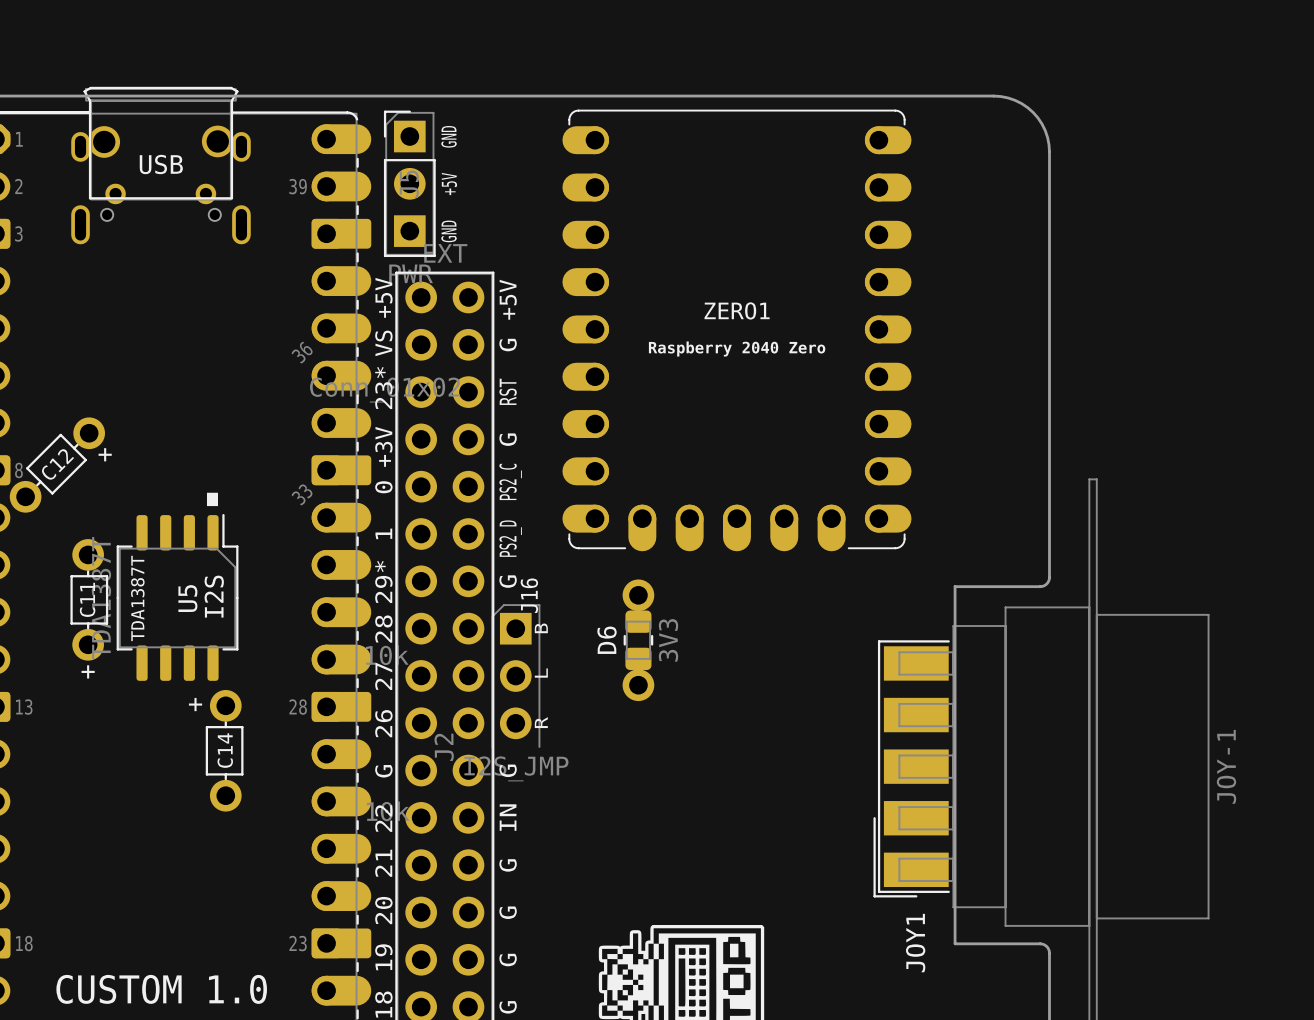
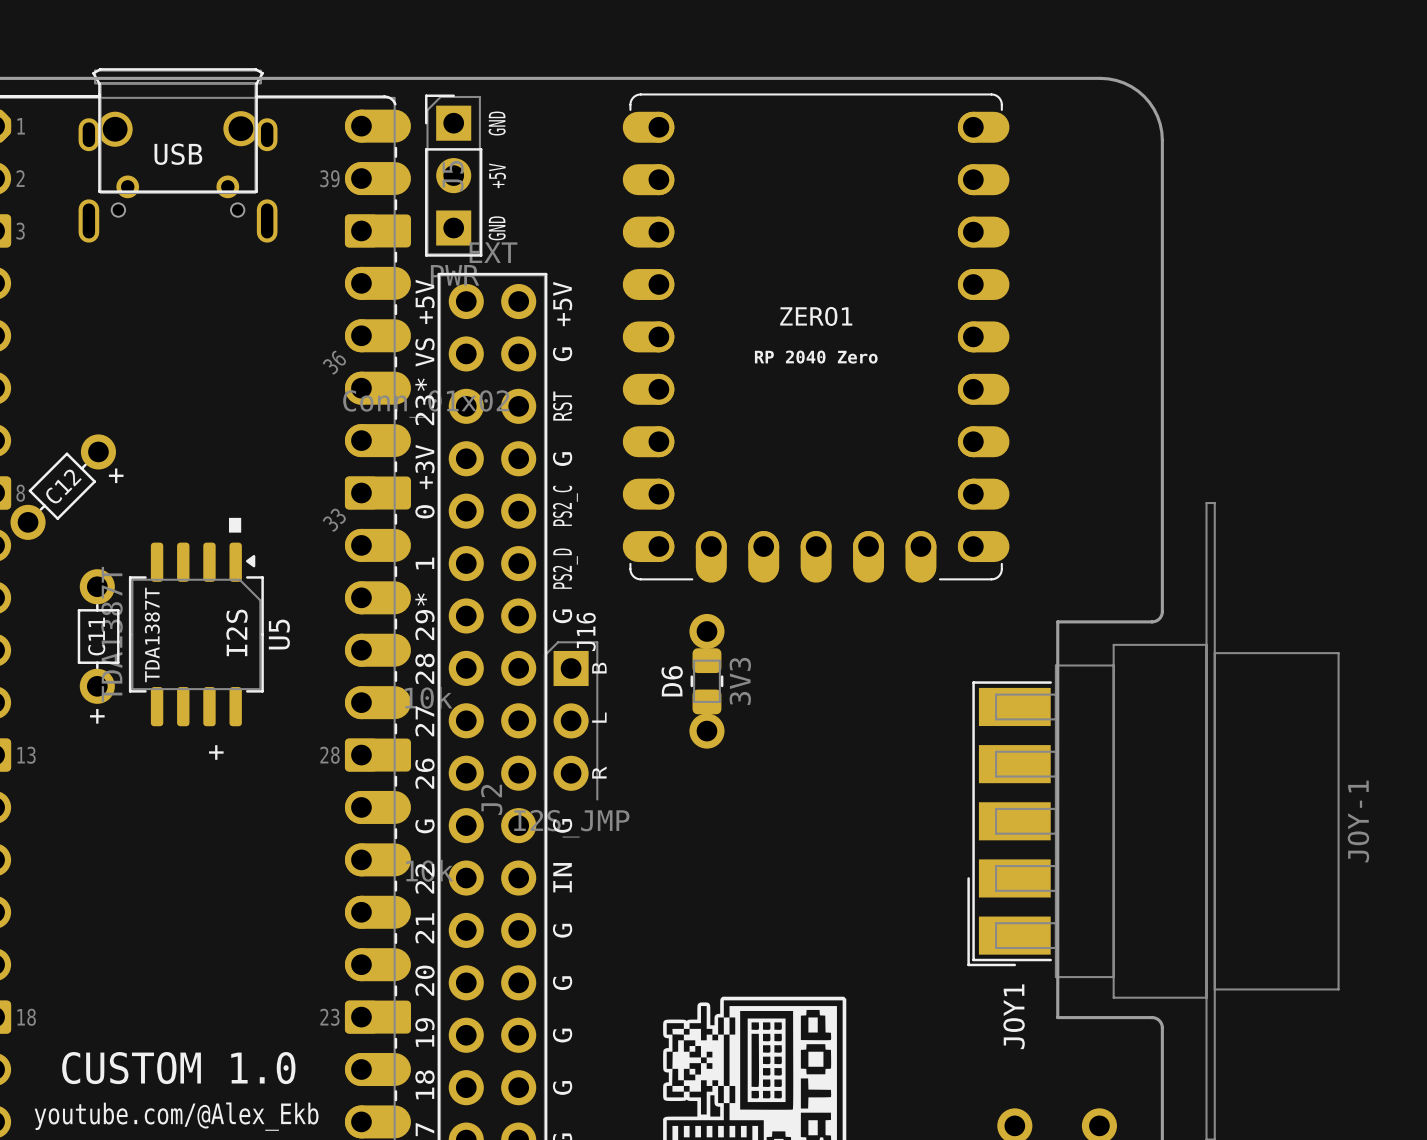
ZERO1 value: Raspberry 2040 Zero (737, 349) -> RP 2040 Zero (816, 357)
U5 footprint: [116, 513, 239, 681] -> [128, 542, 264, 727]
U5 name position: U5 (187, 598) -> U5 (279, 634)
part: (224, 750) -> none

